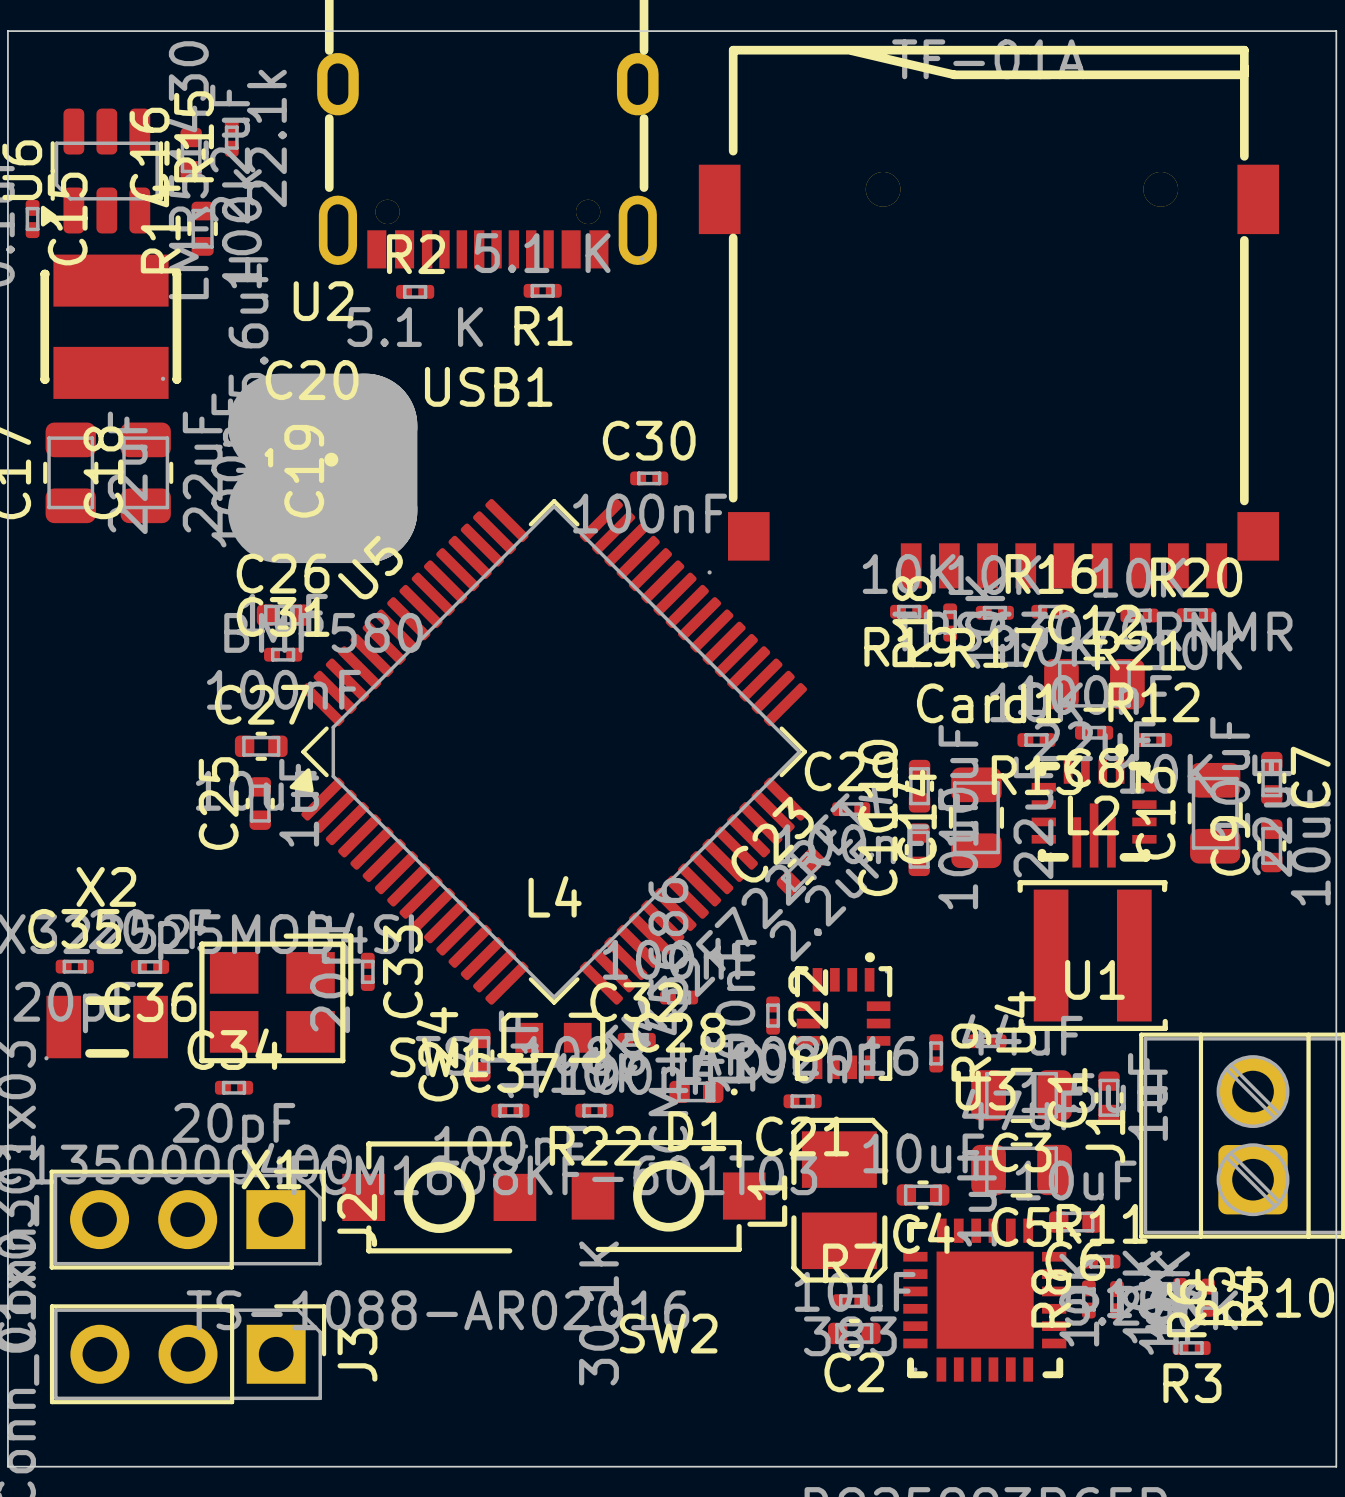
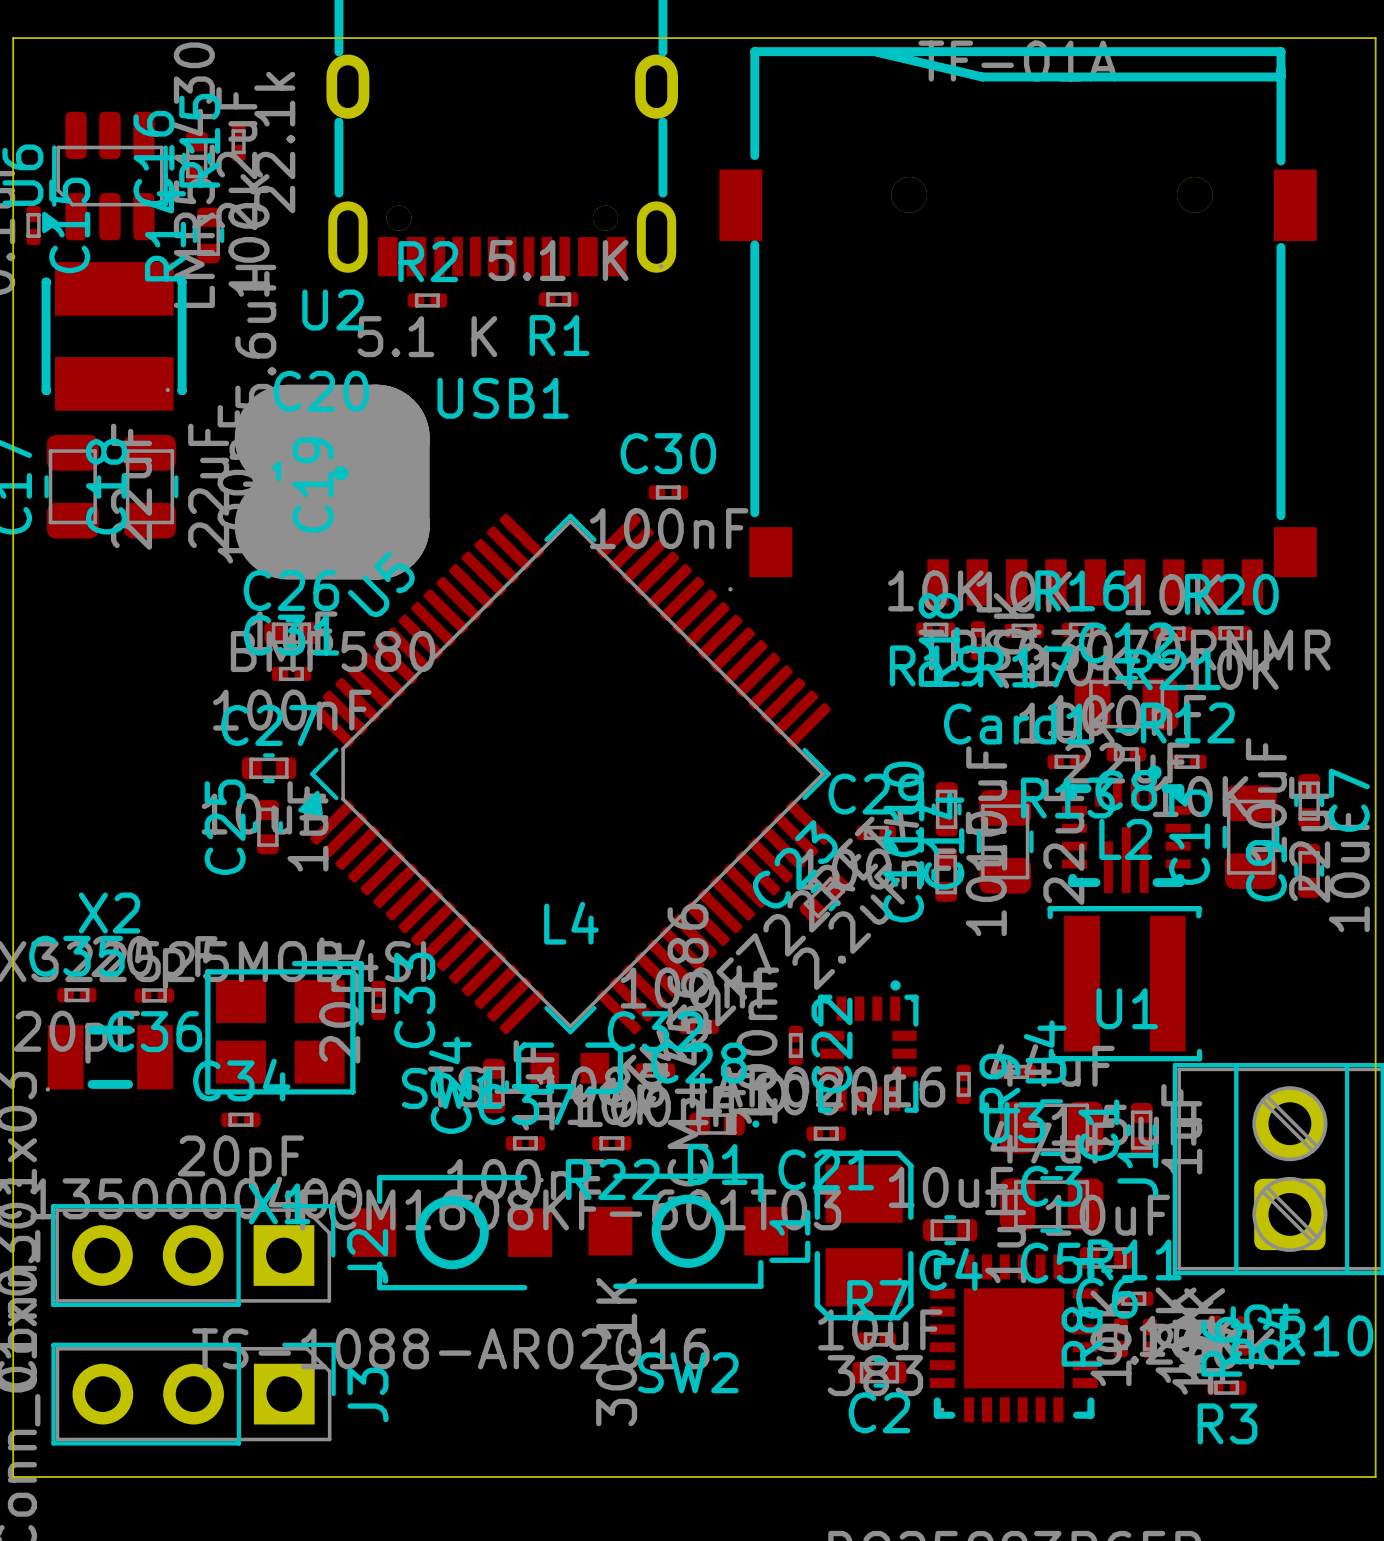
board edge: (1336, 36) (1336, 31) (7, 31) (7, 1466) (1336, 1466) (1336, 1434) -> (1375, 38) (13, 38) (13, 1477) (1375, 1477)

